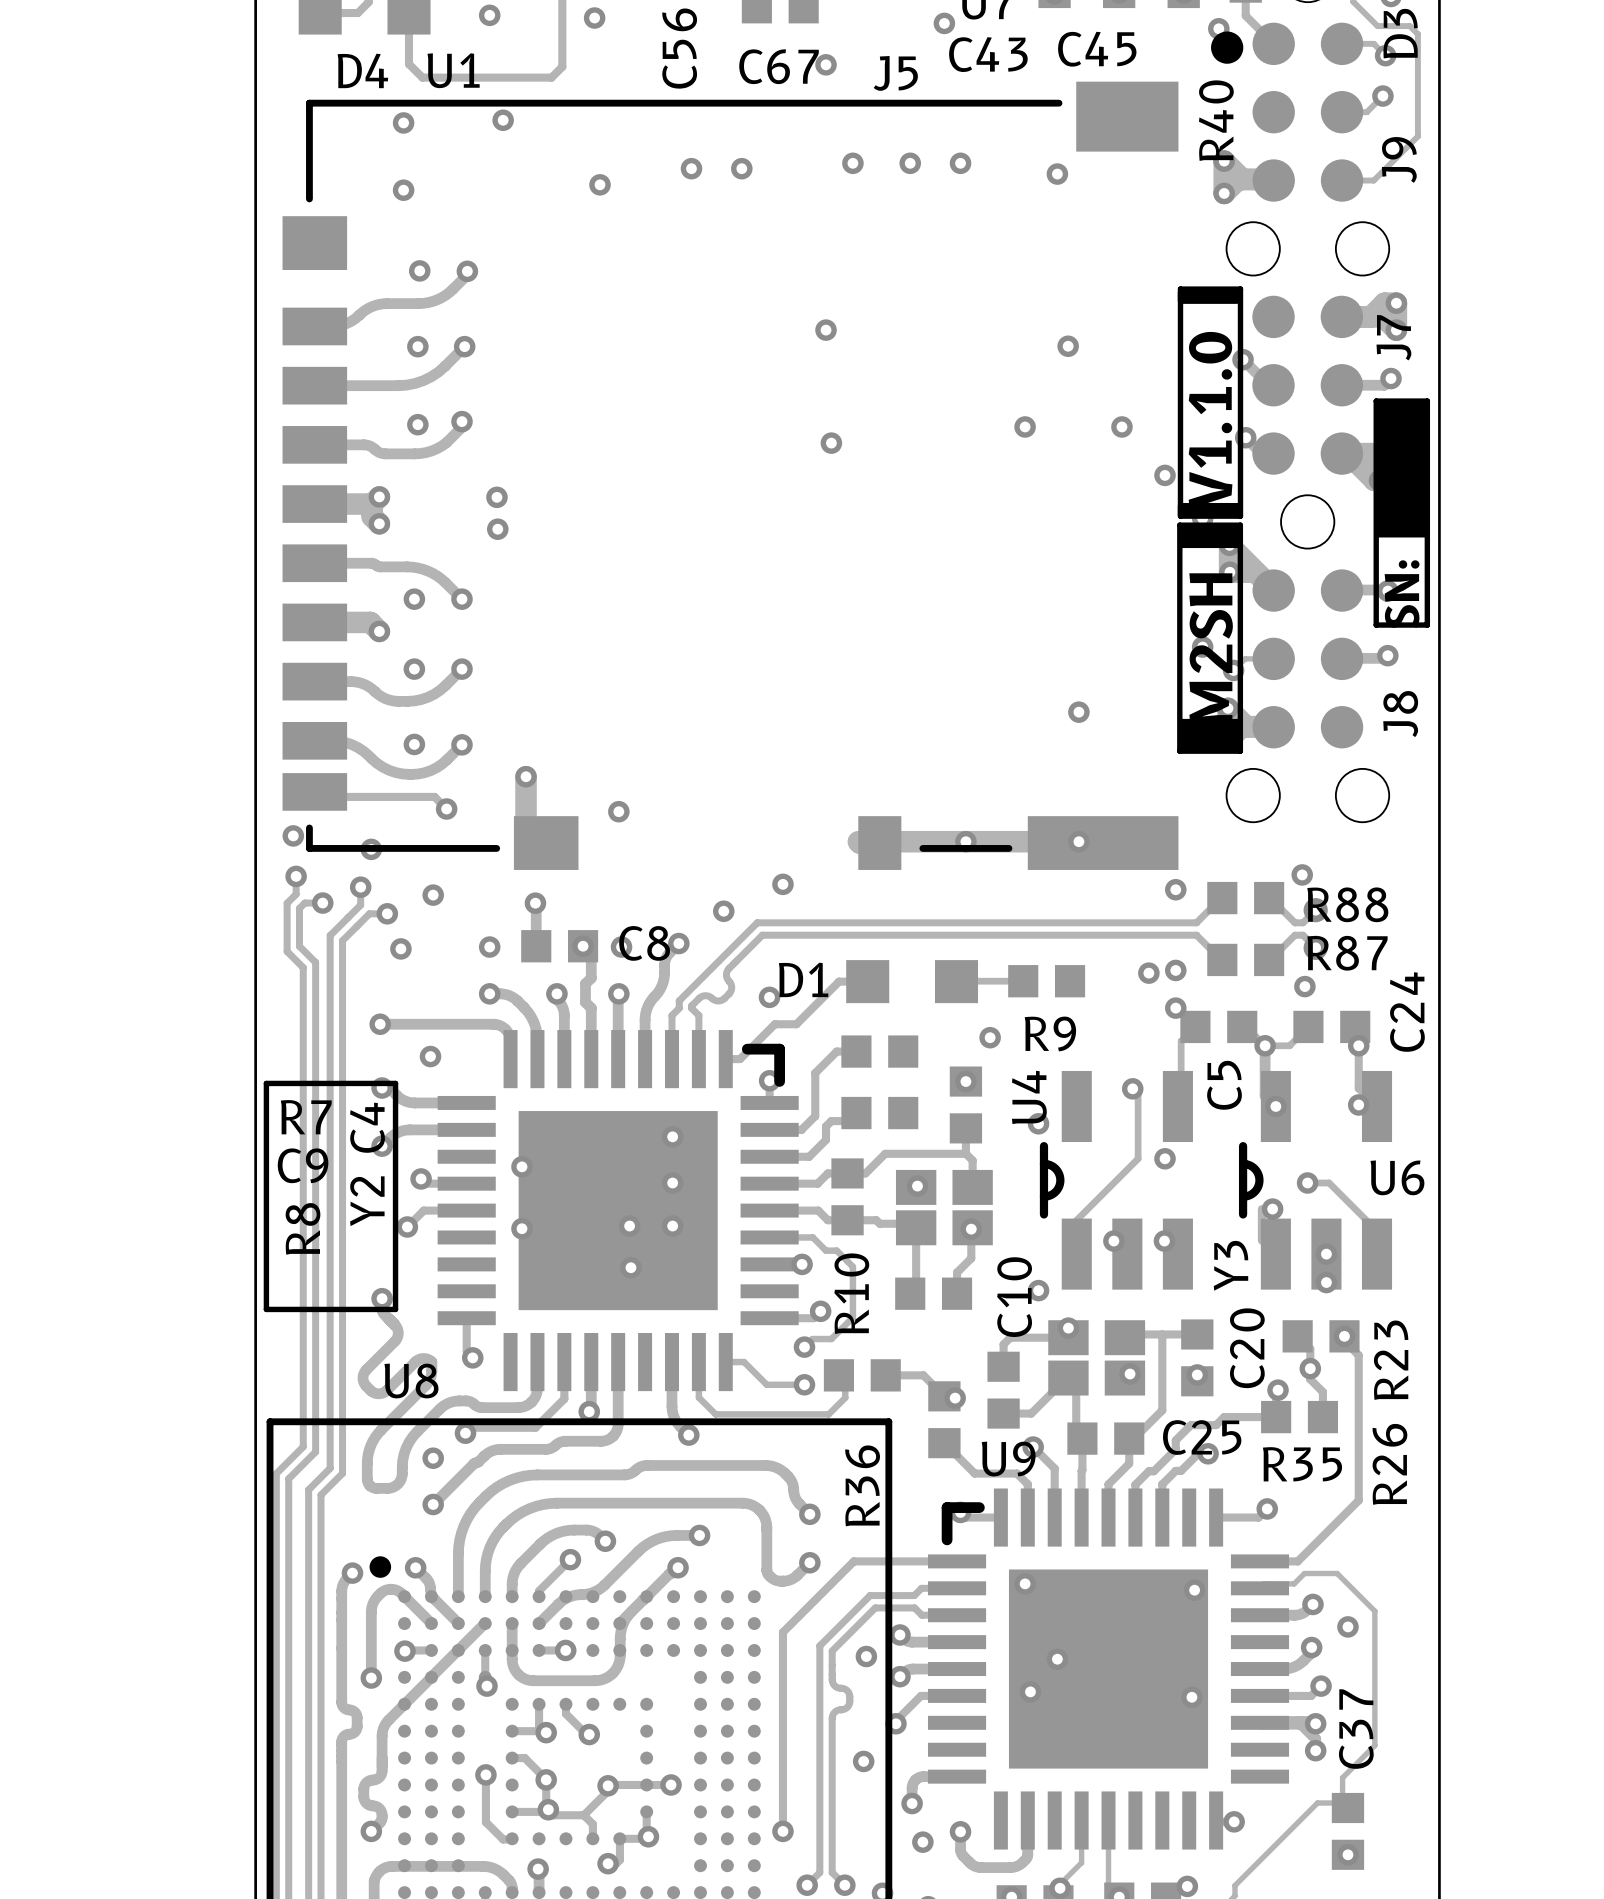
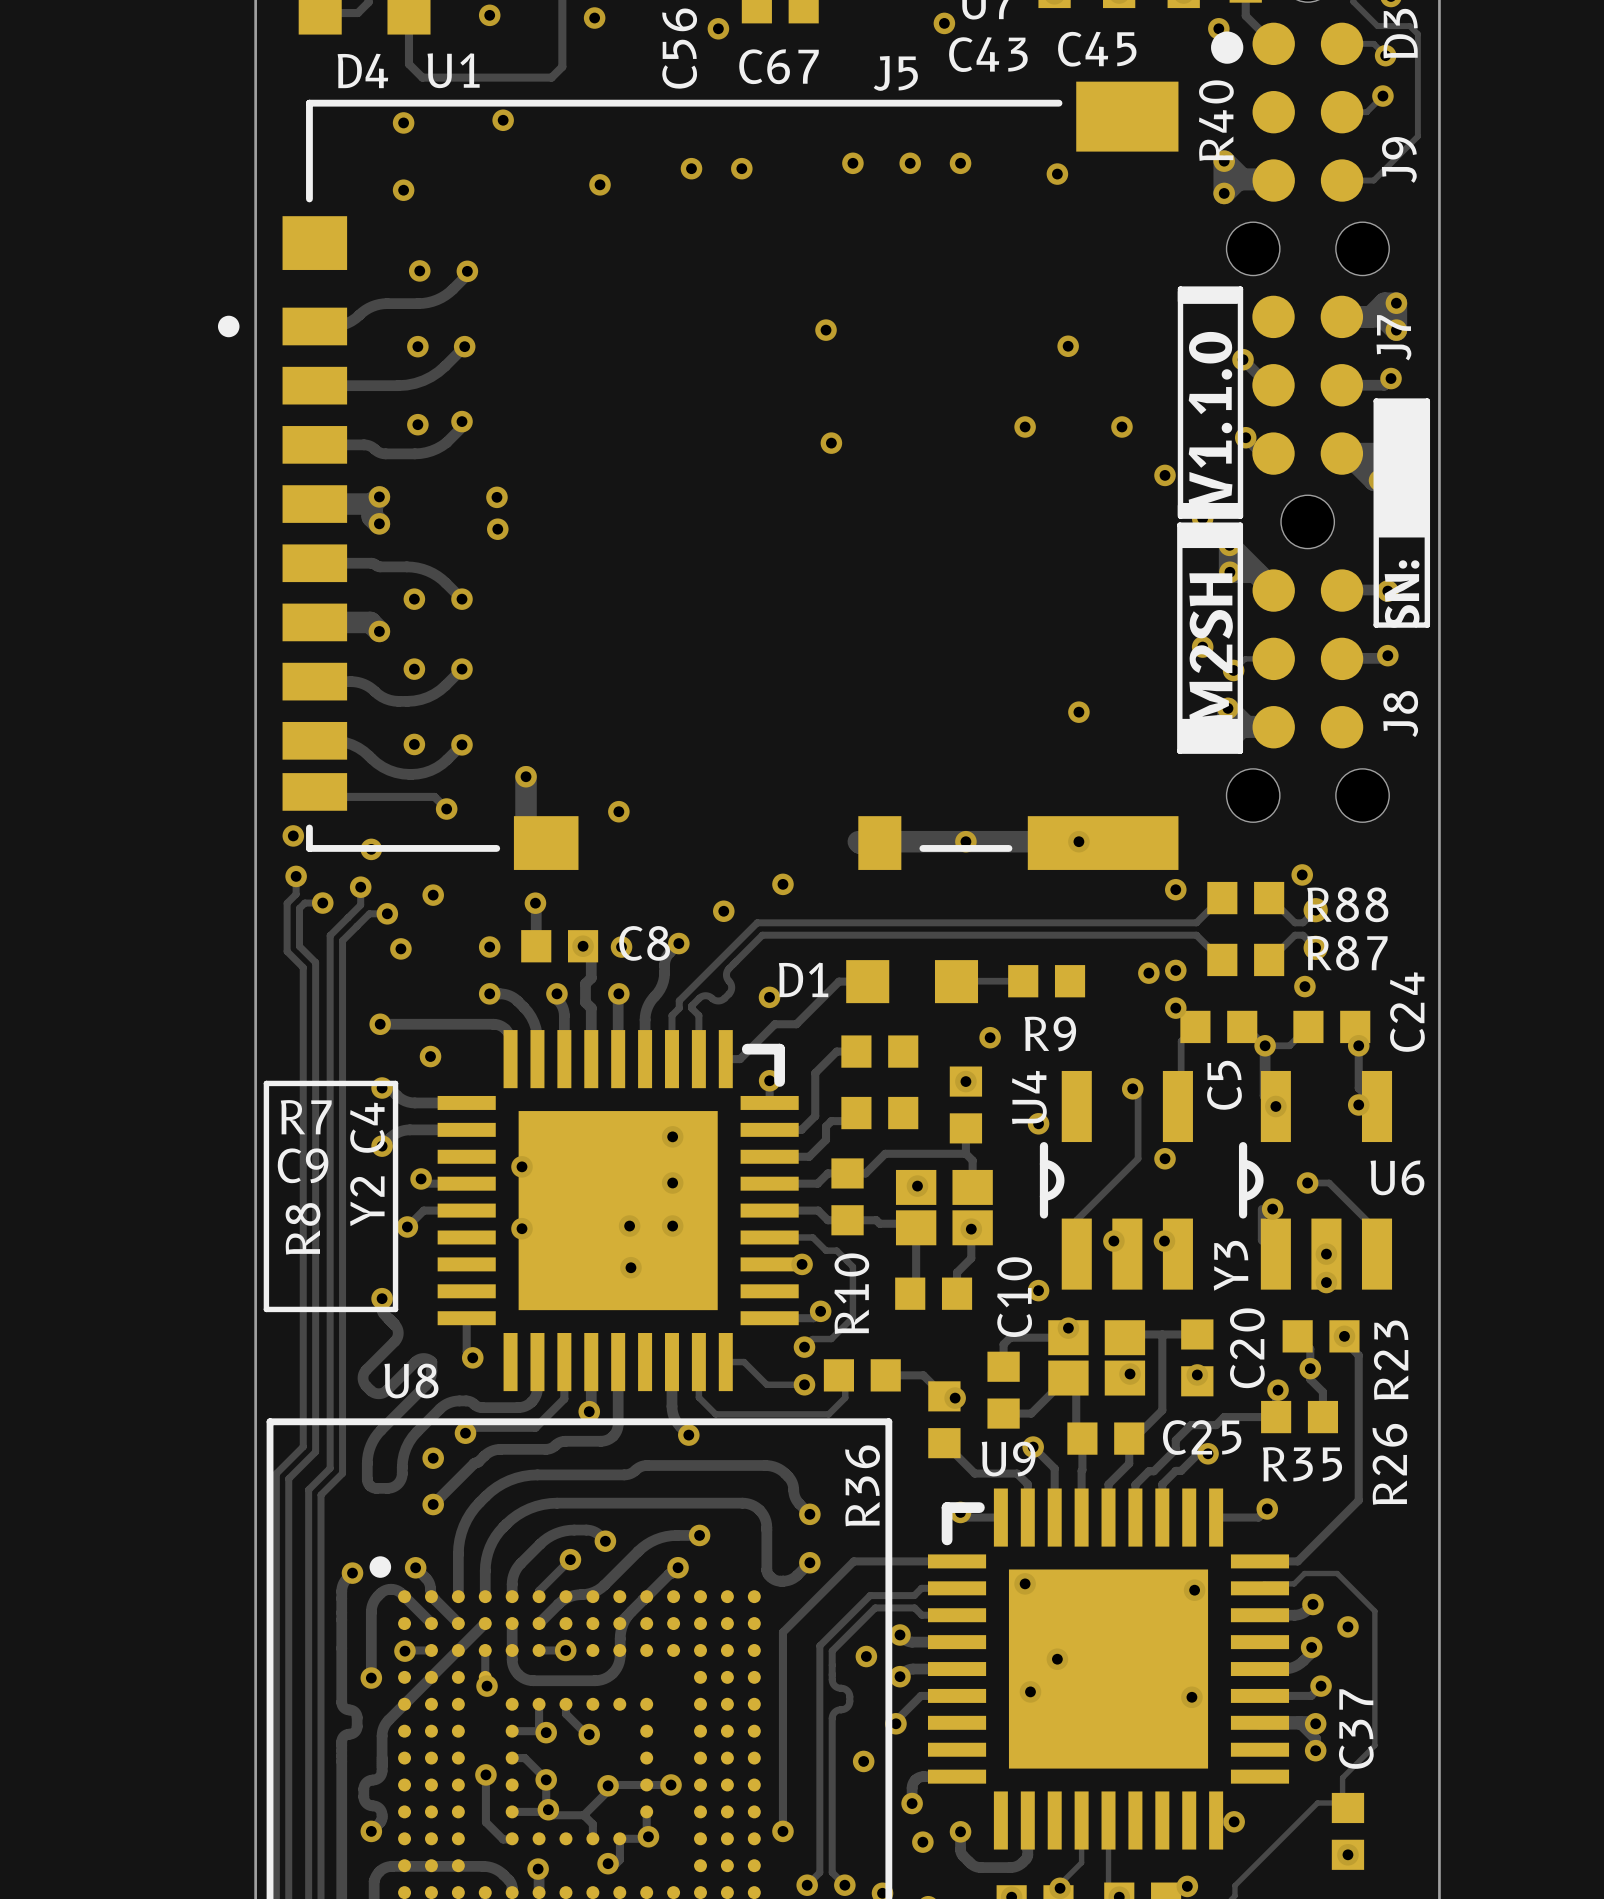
via position: (826, 64) -> (718, 28)
J5 footprint: [282, 81, 1179, 870] -> [217, 81, 1179, 870]

